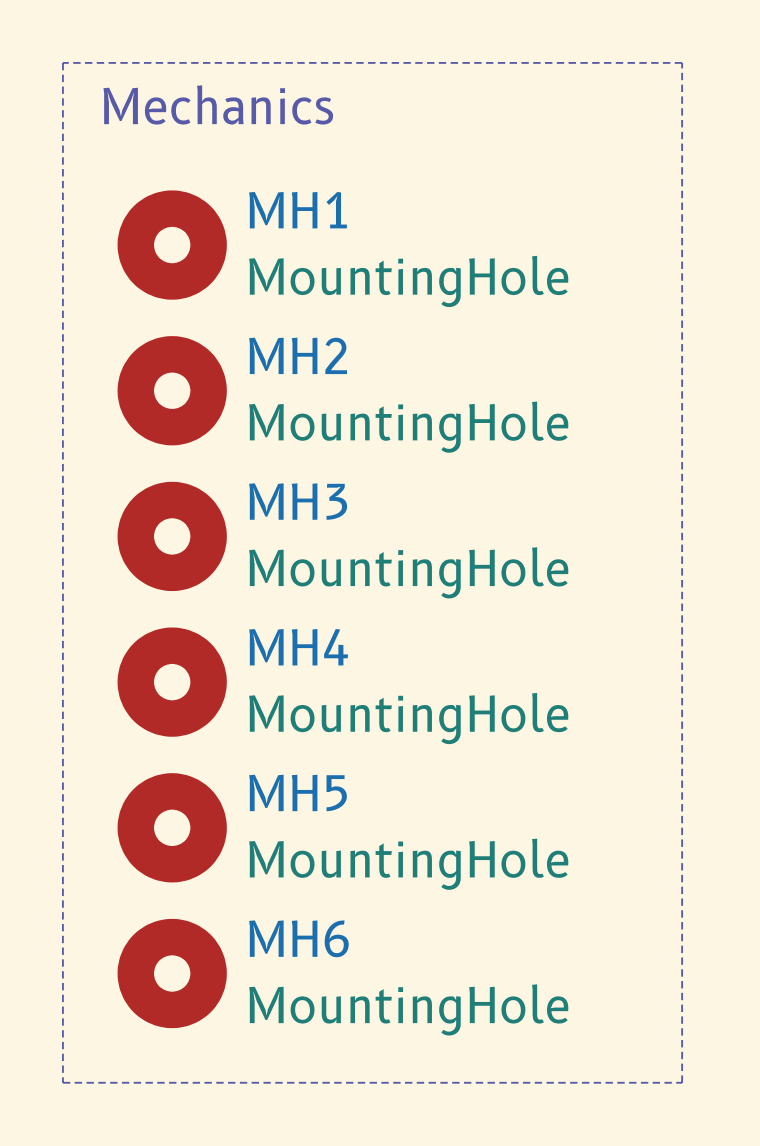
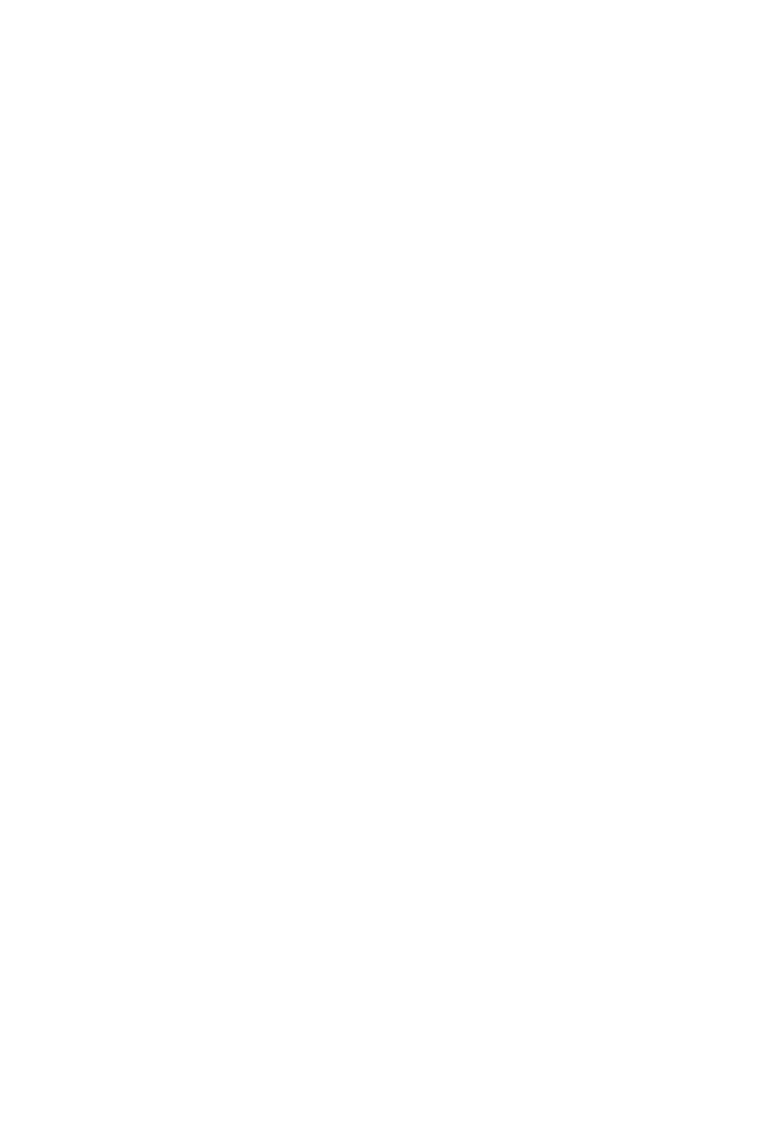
line: (62, 62) (62, 1082) (682, 1082) (682, 62) (62, 62) -> none
text: Mechanics (218, 104) -> none
MH1: MountingHole (172, 245) -> none
MH2: MountingHole (172, 390) -> none
MH3: MountingHole (172, 536) -> none
MH4: MountingHole (172, 682) -> none
MH5: MountingHole (172, 827) -> none
MH6: MountingHole (172, 973) -> none

